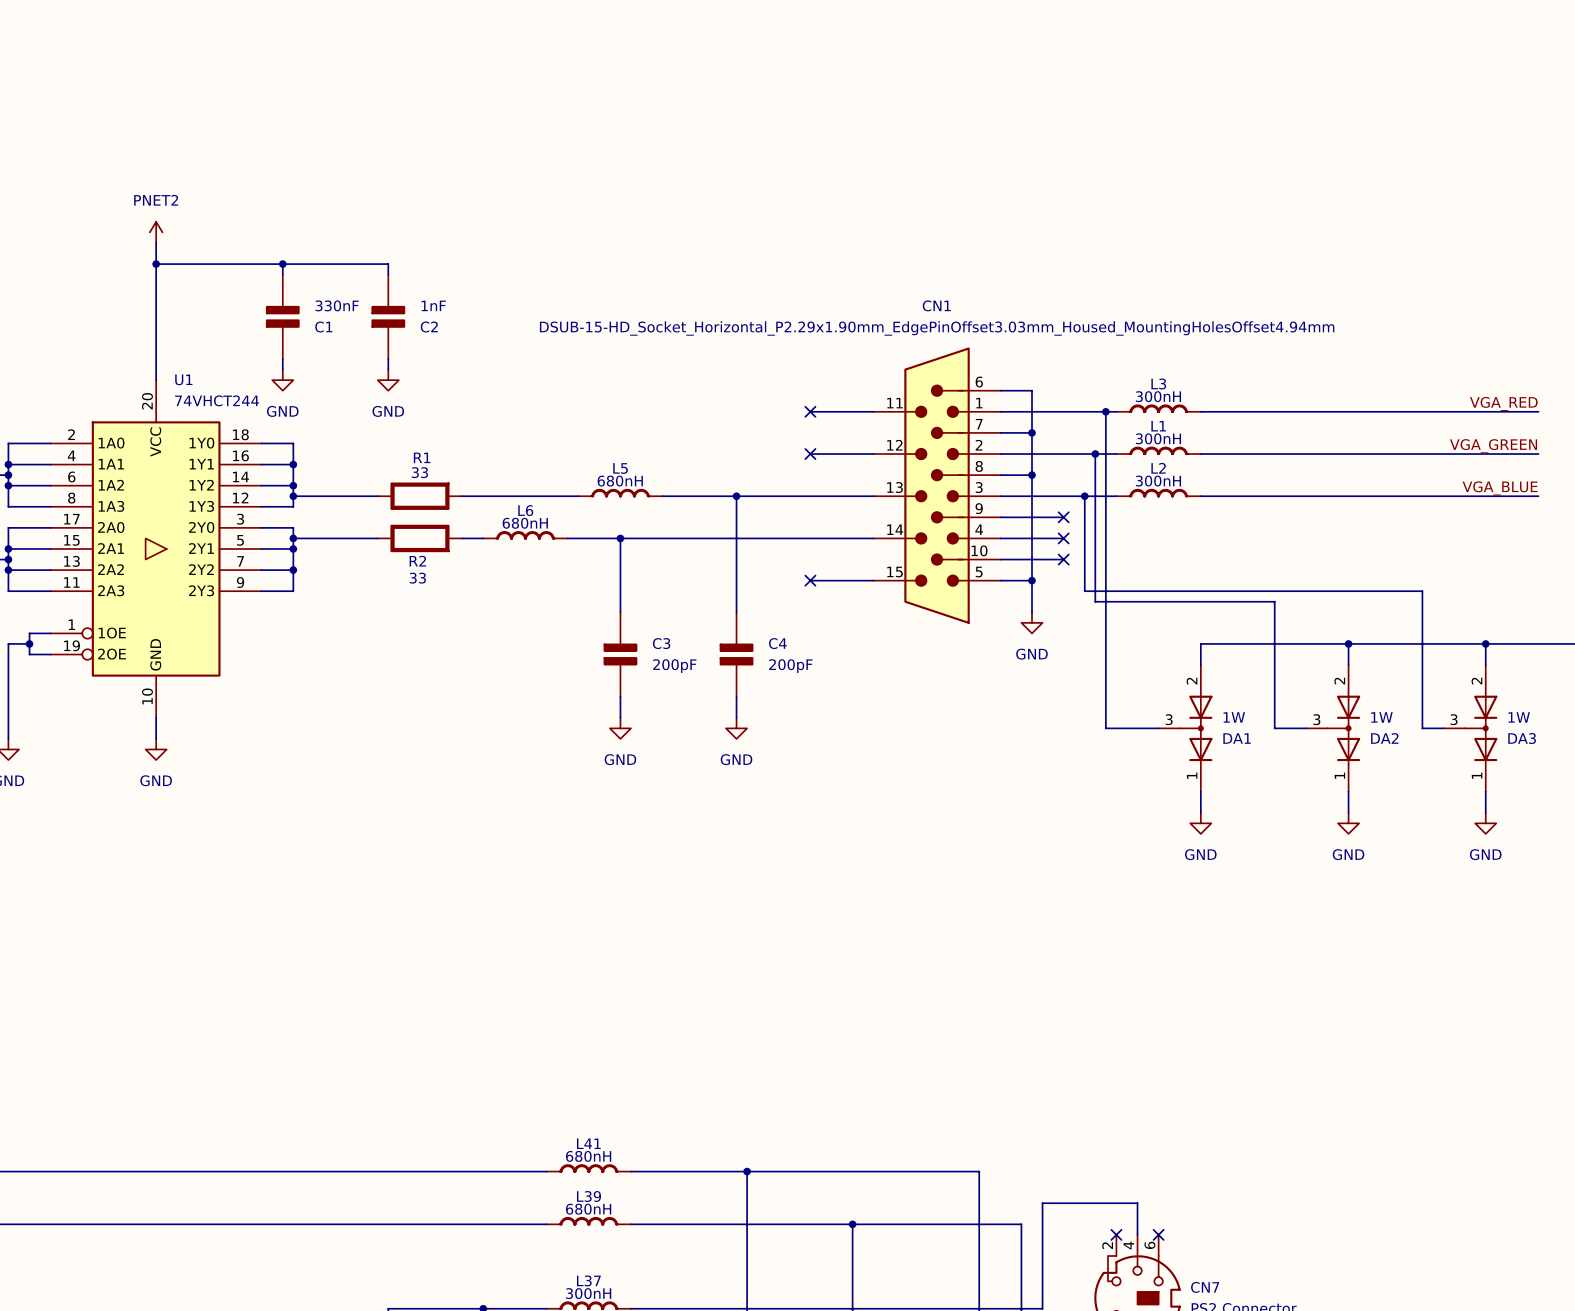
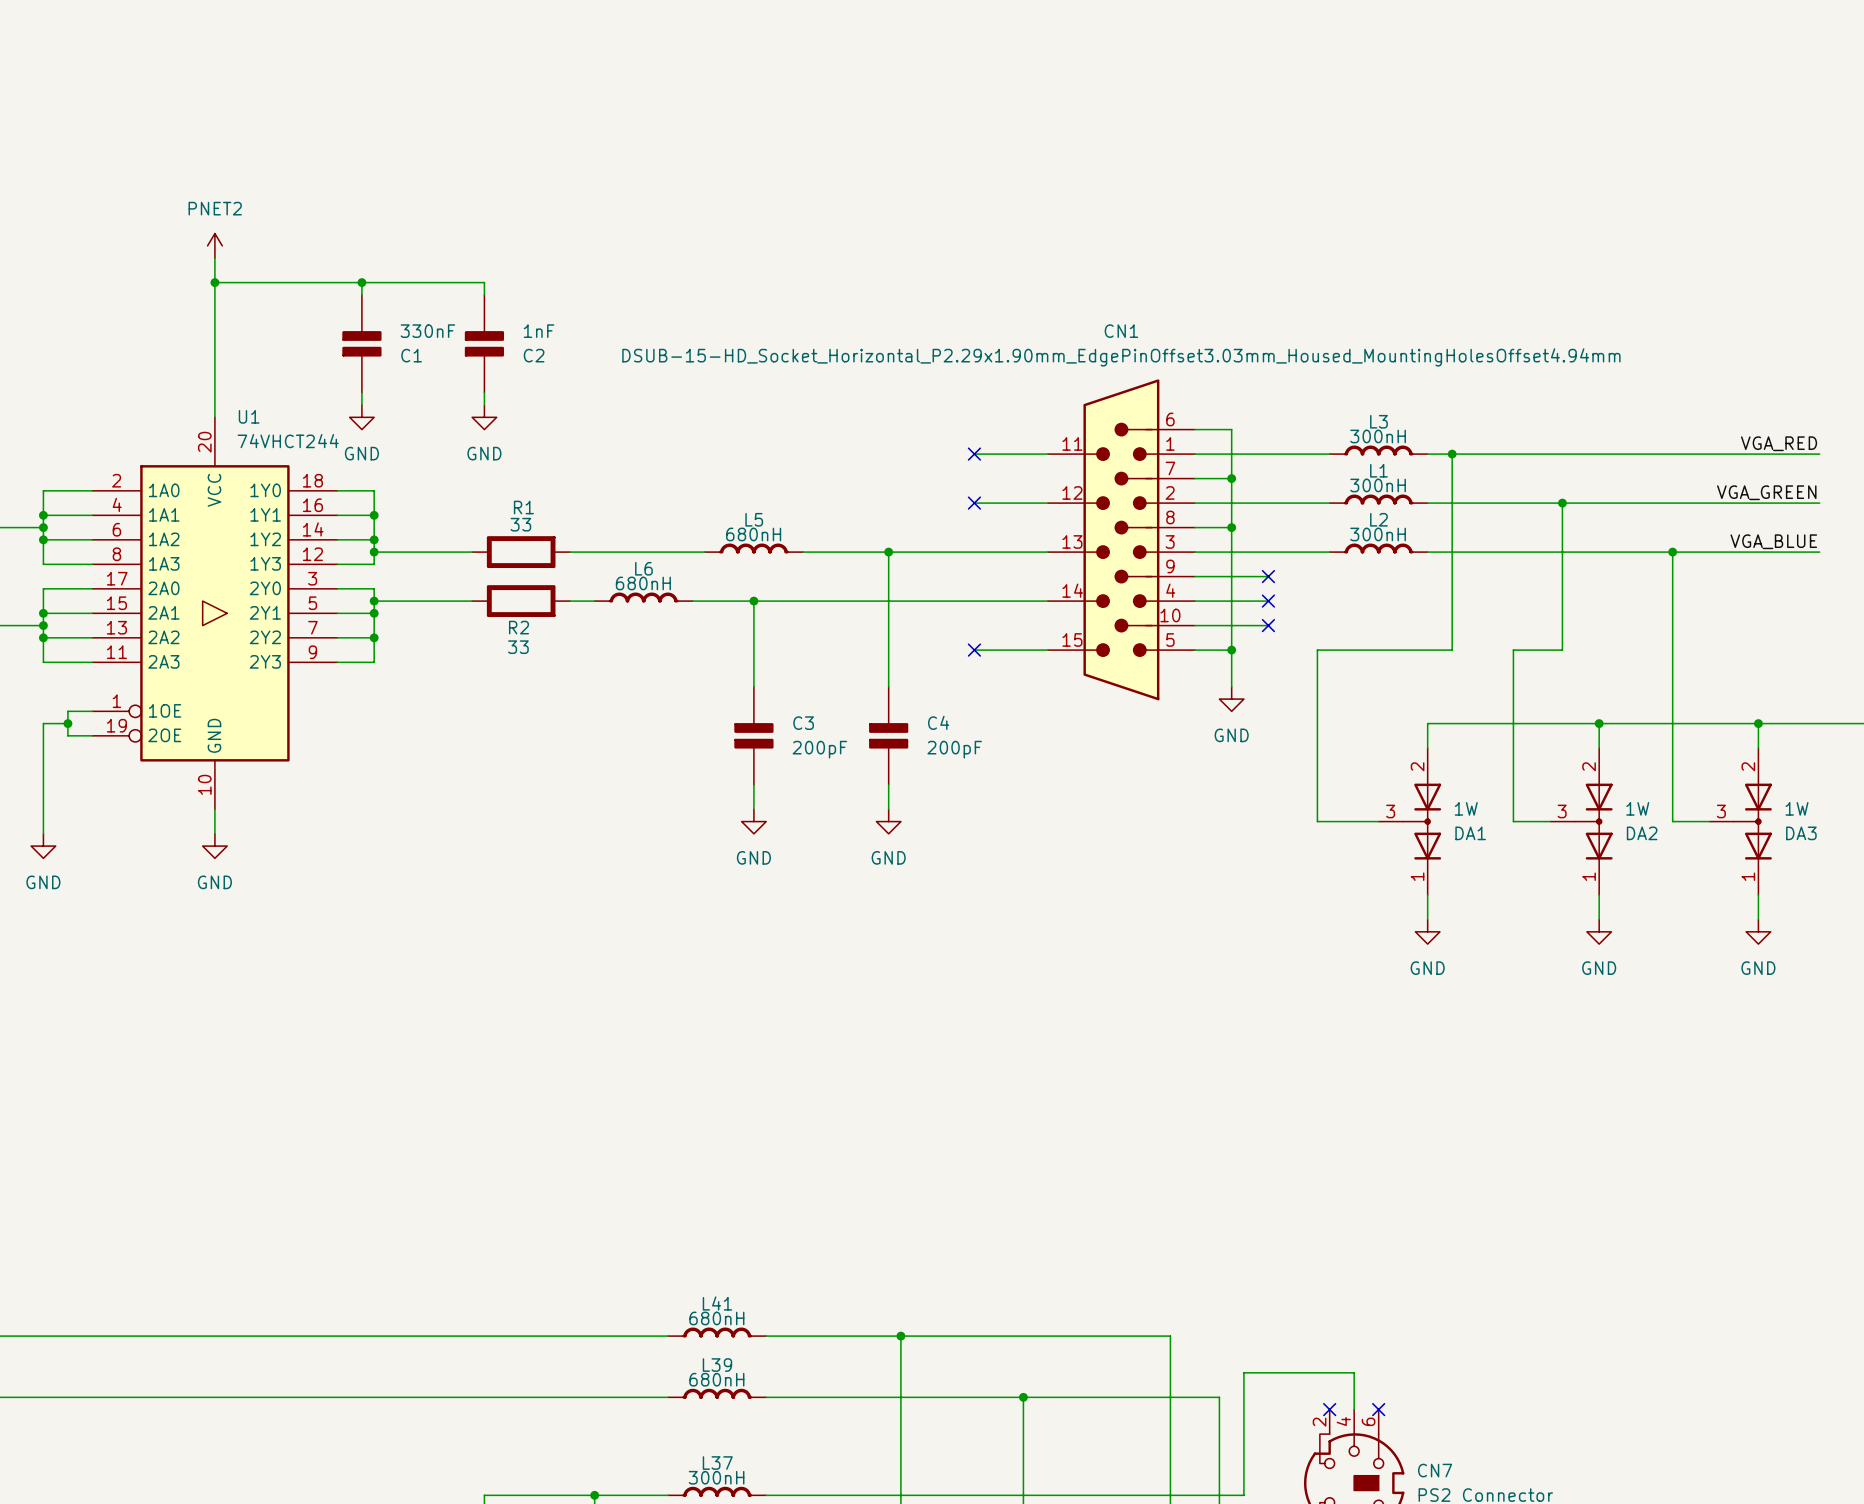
wire: (1105, 411) (1105, 580) -> (1452, 454) (1452, 650) (1317, 650)
junction: (1105, 411) -> none
junction: none -> (1452, 454)
wire: (1095, 454) (1095, 601) (1274, 601) -> (1562, 503) (1562, 650) (1513, 650) (1513, 674)
junction: (1095, 454) -> none
junction: none -> (1562, 503)
wire: (1084, 496) (1084, 591) (1422, 591) (1422, 728) -> (1672, 552) (1672, 821) (1684, 821)
junction: (1084, 496) -> none
junction: none -> (1672, 552)

